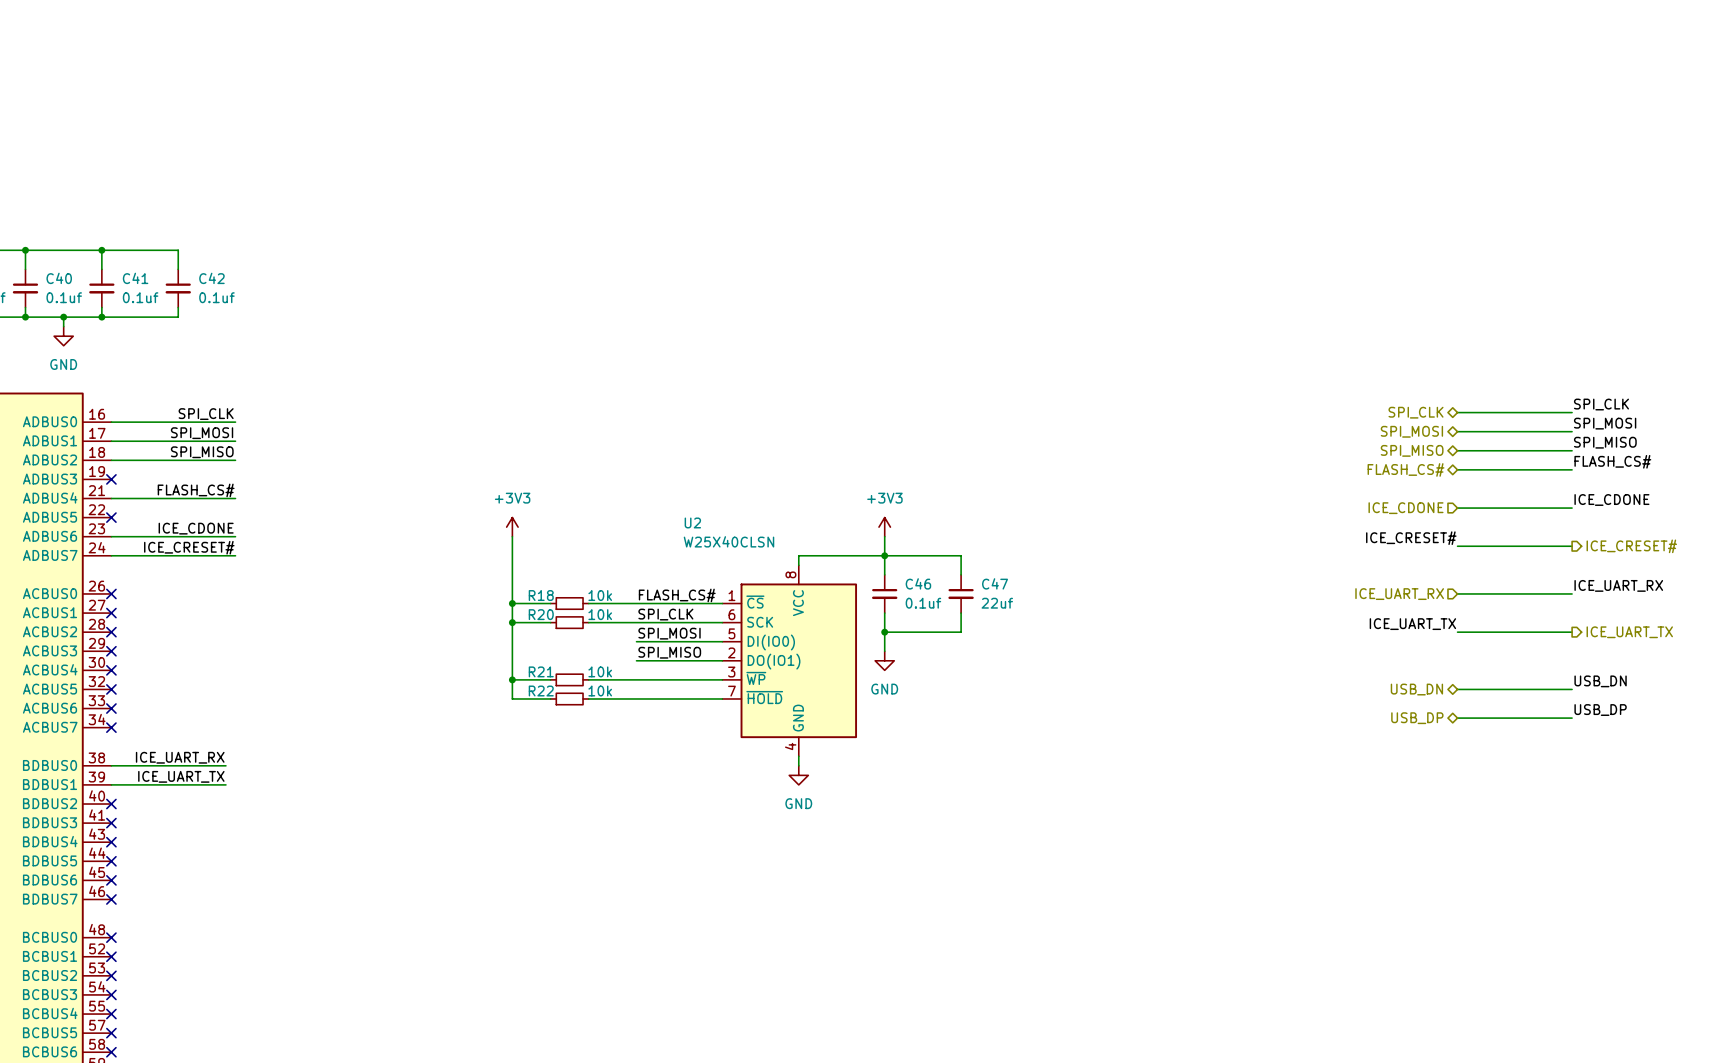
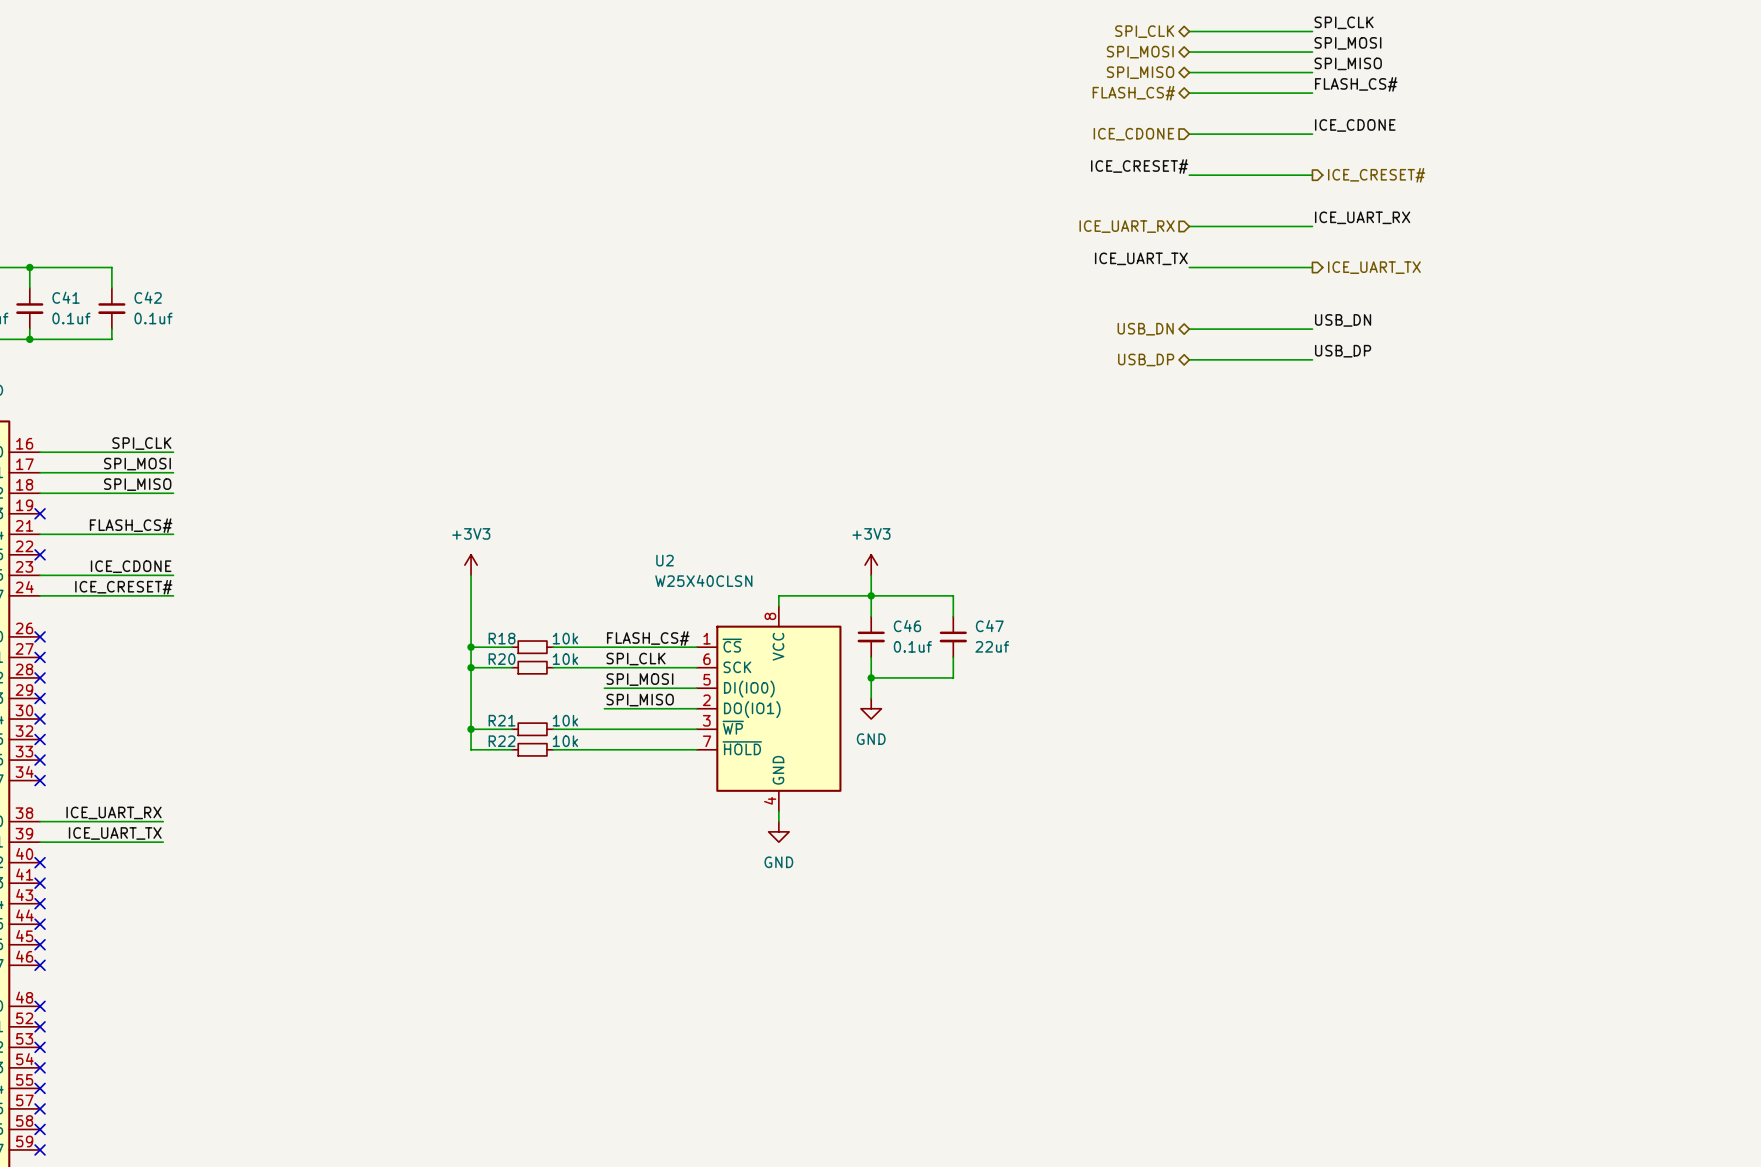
label: none -> SPI_CLK (1344, 22)
hierarchical label: none -> SPI_CLK (1144, 31)
wire: none -> (1189, 31) (1312, 31)
label: none -> SPI_MOSI (1347, 43)
hierarchical label: none -> SPI_MOSI (1140, 52)
wire: none -> (1189, 52) (1312, 52)
label: none -> SPI_MISO (1348, 63)
hierarchical label: none -> SPI_MISO (1140, 72)
wire: none -> (1189, 72) (1312, 72)
label: none -> FLASH_CS# (1356, 84)
wire: none -> (1189, 93) (1312, 93)
hierarchical label: none -> FLASH_CS# (1133, 93)
label: none -> ICE_CDONE (1355, 125)
hierarchical label: none -> ICE_CDONE (1133, 134)
wire: none -> (1189, 134) (1312, 134)
label: none -> ICE_CRESET# (1139, 166)
wire: none -> (1189, 175) (1312, 175)
hierarchical label: none -> ICE_CRESET# (1376, 175)
label: none -> ICE_UART_RX (1362, 217)
hierarchical label: none -> ICE_UART_RX (1127, 226)
wire: none -> (1189, 226) (1312, 226)
label: none -> ICE_UART_TX (1141, 258)
wire: none -> (1189, 267) (1312, 267)
hierarchical label: none -> ICE_UART_TX (1374, 267)
label: none -> USB_DN (1343, 320)
hierarchical label: none -> USB_DN (1145, 329)
wire: none -> (1189, 329) (1312, 329)
label: none -> USB_DP (1343, 351)
hierarchical label: none -> USB_DP (1146, 359)
wire: none -> (1189, 359) (1312, 359)
label: SPI_CLK (1601, 404) -> none
hierarchical label: SPI_CLK (1416, 412) -> none
wire: (1457, 412) (1572, 412) -> none
label: SPI_MOSI (1605, 423) -> none
hierarchical label: SPI_MOSI (1411, 431) -> none
wire: (1457, 431) (1572, 431) -> none
label: SPI_MISO (1605, 442) -> none
hierarchical label: SPI_MISO (1412, 450) -> none
wire: (1457, 450) (1572, 450) -> none
label: FLASH_CS# (1612, 461) -> none
hierarchical label: FLASH_CS# (1406, 469) -> none
wire: (1457, 469) (1572, 469) -> none
label: ICE_CDONE (1611, 499) -> none
hierarchical label: ICE_CDONE (1406, 508) -> none
wire: (1457, 508) (1572, 508) -> none
label: ICE_CRESET# (1411, 538) -> none
wire: (1457, 546) (1572, 546) -> none
hierarchical label: ICE_CRESET# (1631, 546) -> none
label: ICE_UART_RX (1618, 585) -> none
wire: (1457, 593) (1572, 593) -> none
hierarchical label: ICE_UART_RX (1399, 594) -> none
label: ICE_UART_TX (1412, 624) -> none
wire: (1457, 632) (1572, 632) -> none
hierarchical label: ICE_UART_TX (1629, 632) -> none
label: USB_DN (1600, 681) -> none
hierarchical label: USB_DN (1416, 689) -> none
wire: (1457, 689) (1572, 689) -> none
label: USB_DP (1600, 710) -> none
hierarchical label: USB_DP (1417, 718) -> none
wire: (1457, 718) (1572, 718) -> none

